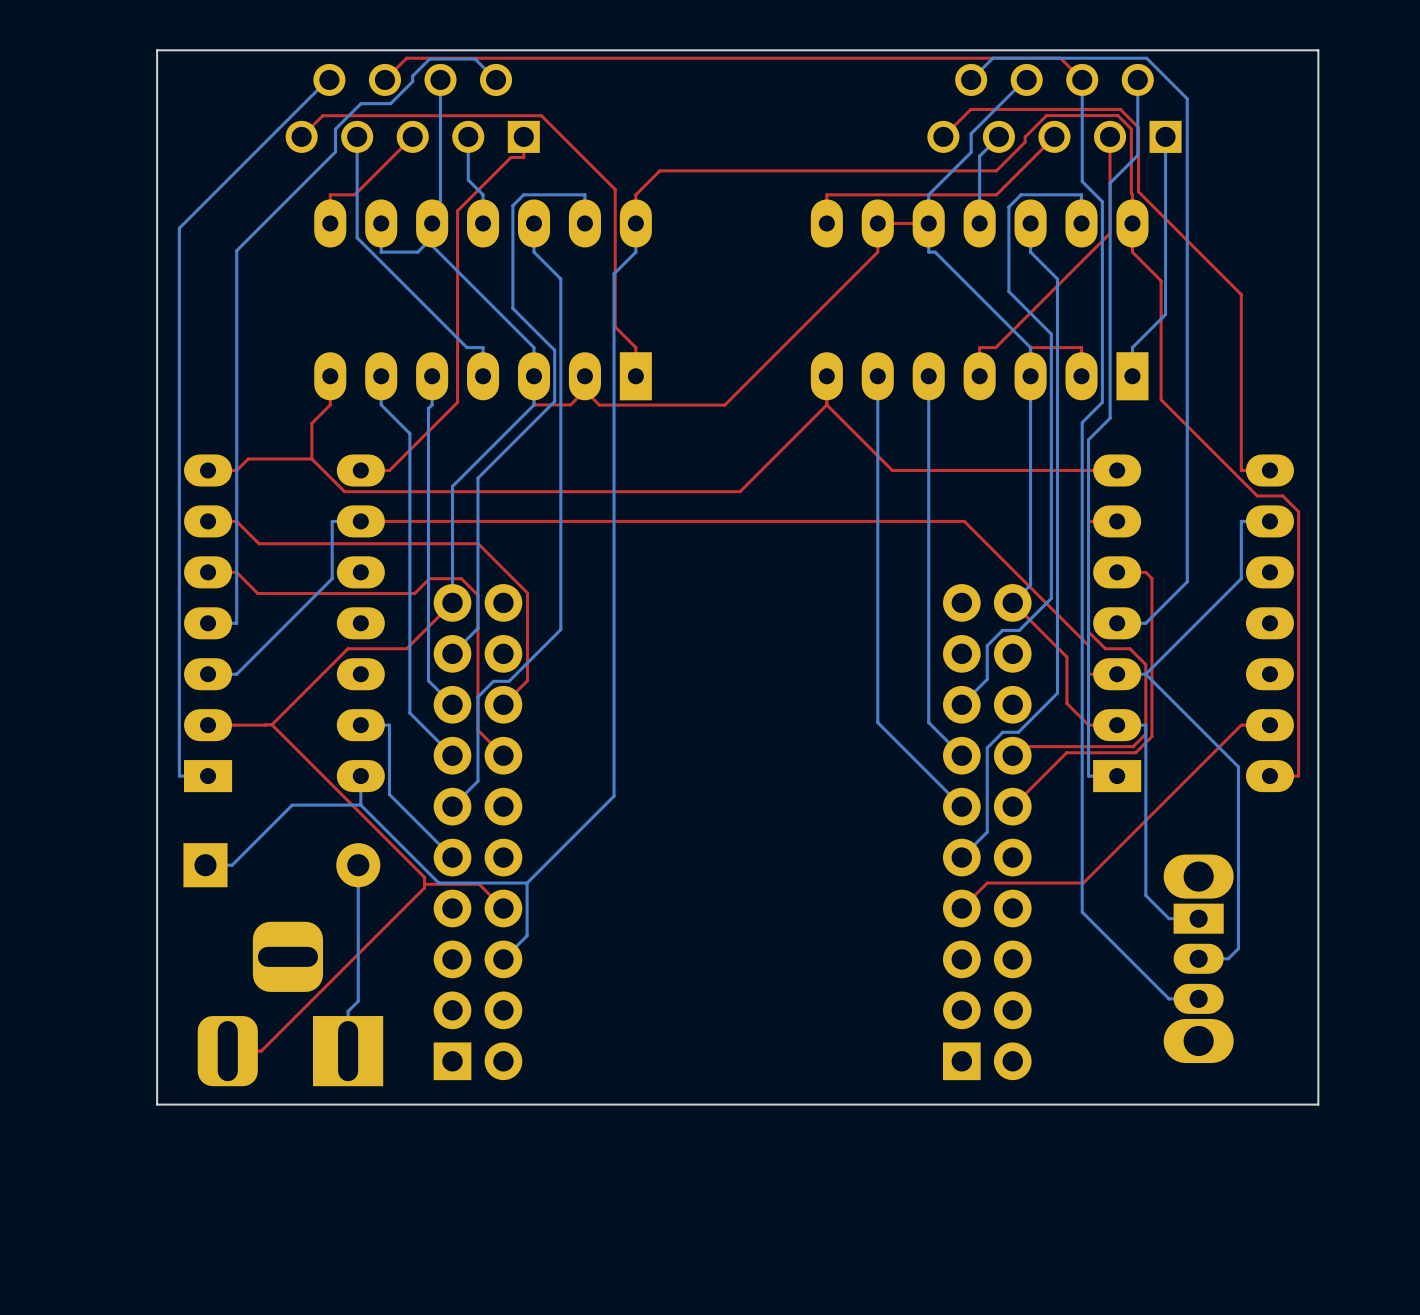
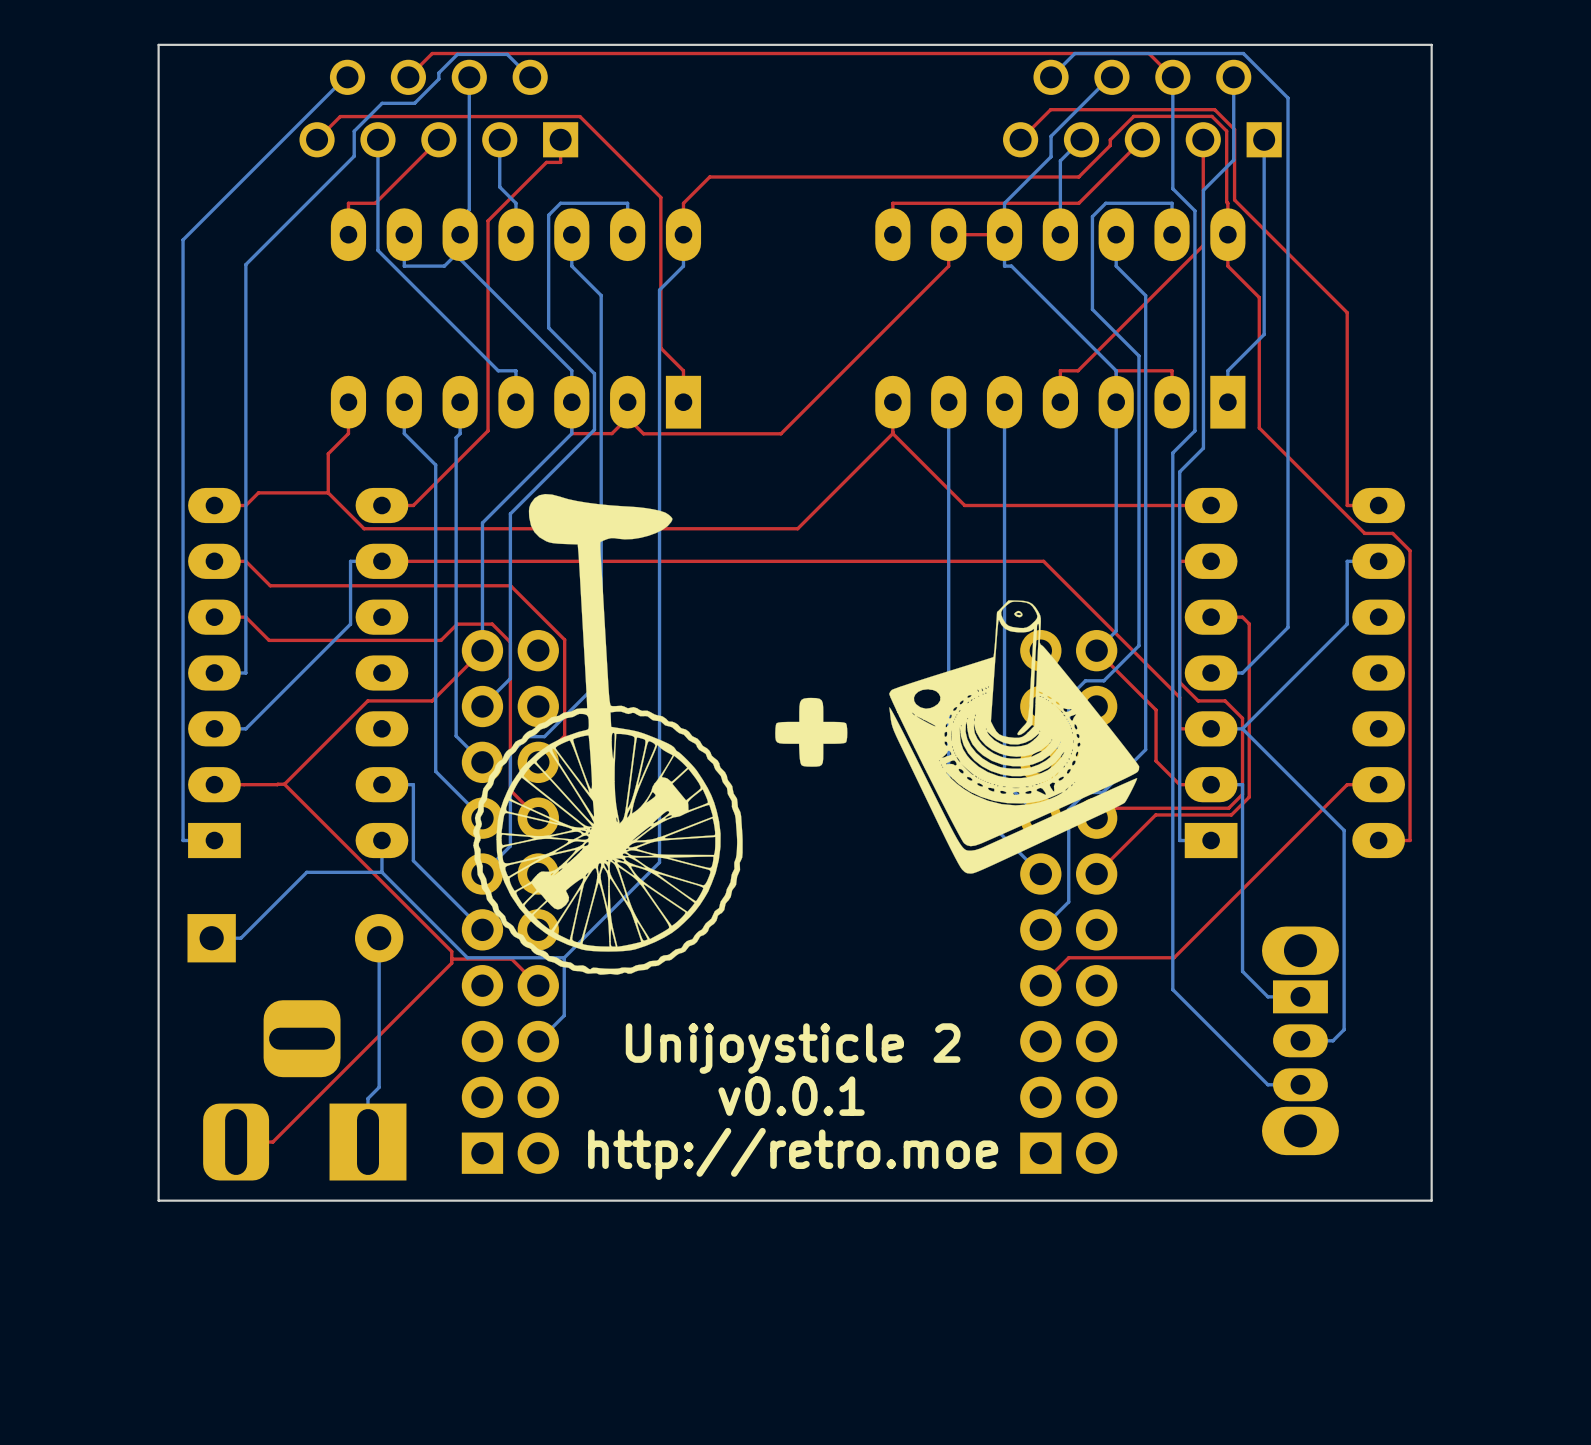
drawing: none -> [473, 493, 1140, 975]
text: none -> Unijoysticle 2 (793, 1048)
text: none -> v0.0.1 (791, 1096)
text: none -> http://retro.moe (793, 1153)

